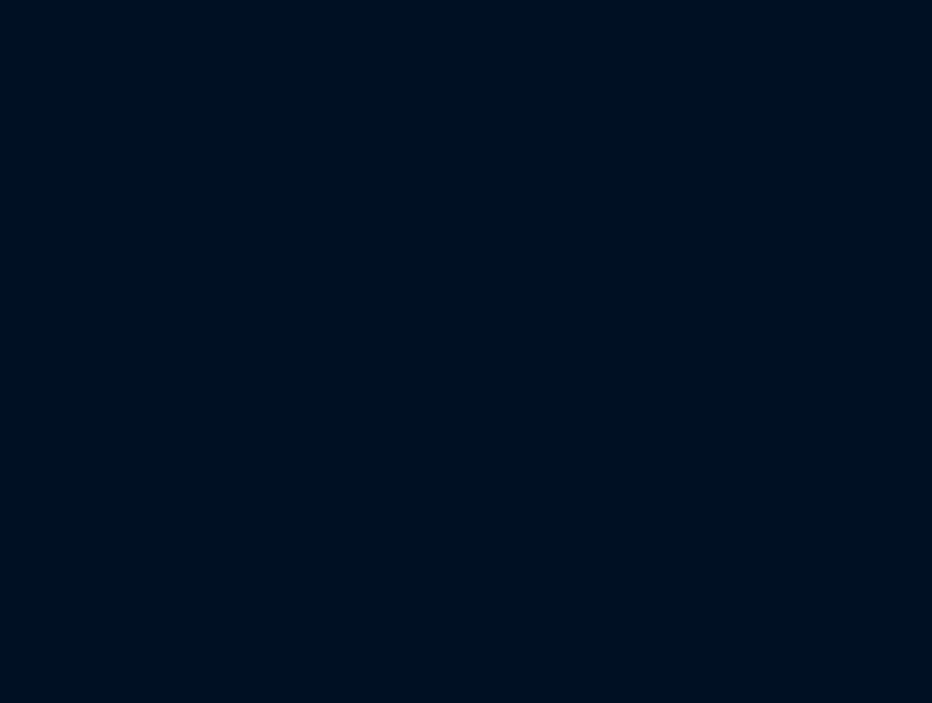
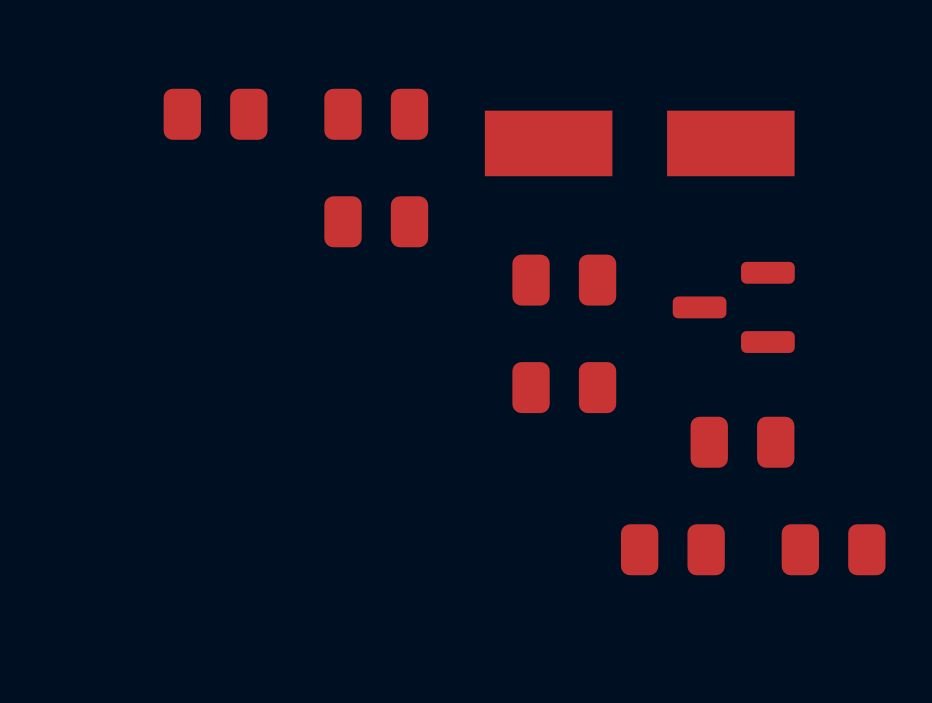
part: none -> (215, 114)
part: none -> (376, 114)
part: none -> (639, 143)
part: none -> (376, 221)
part: none -> (564, 280)
part: none -> (733, 307)
part: none -> (564, 387)
part: none -> (742, 442)
part: none -> (672, 549)
part: none -> (833, 549)

